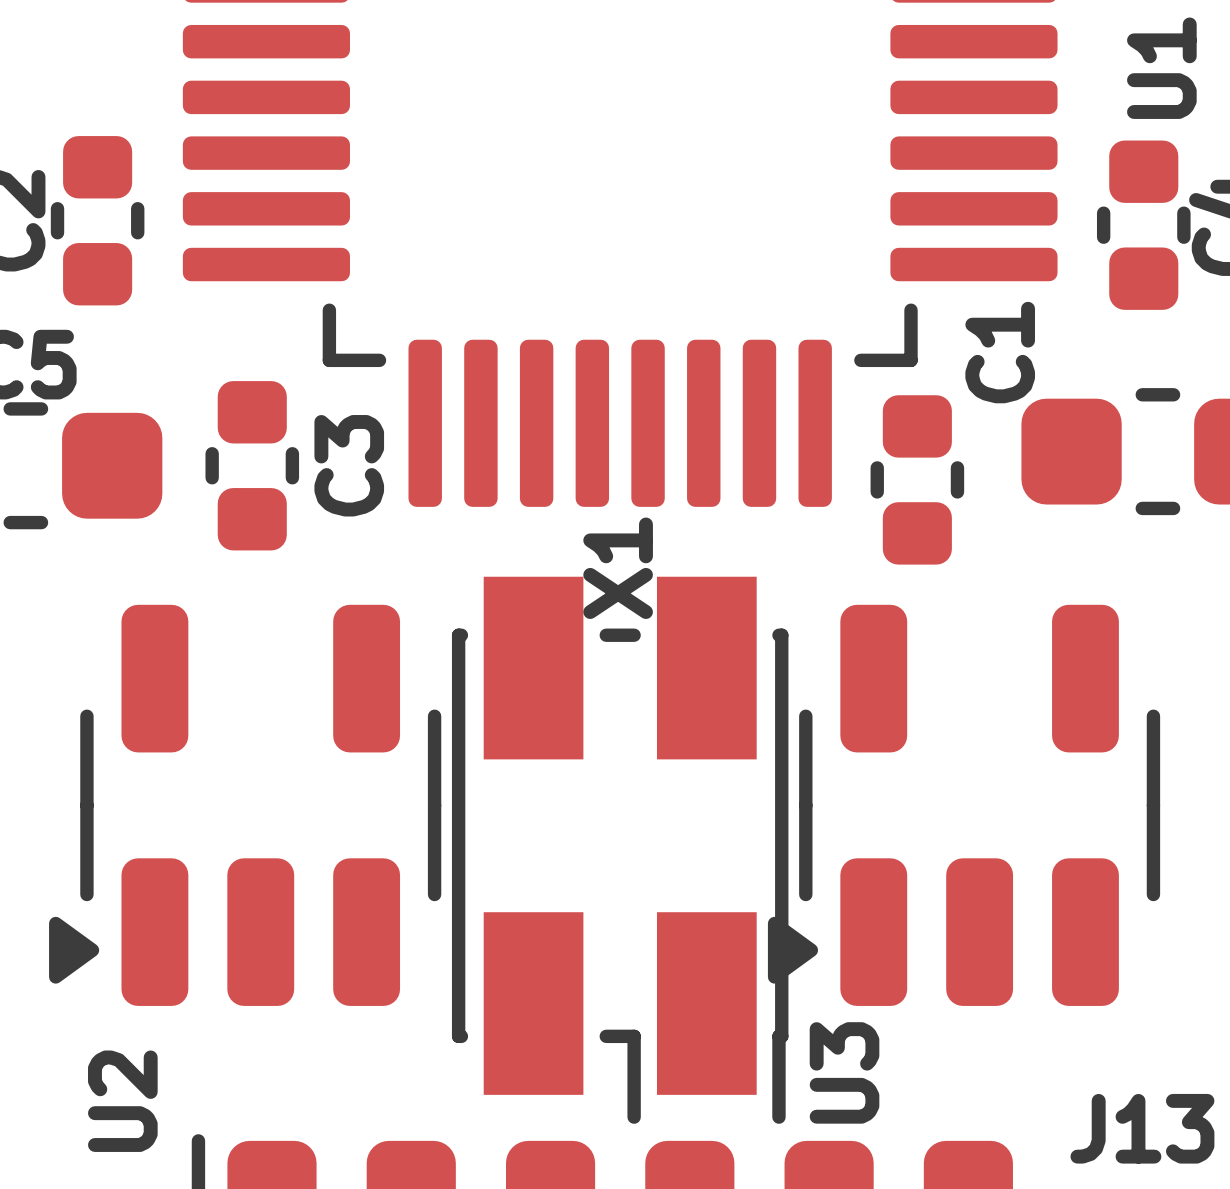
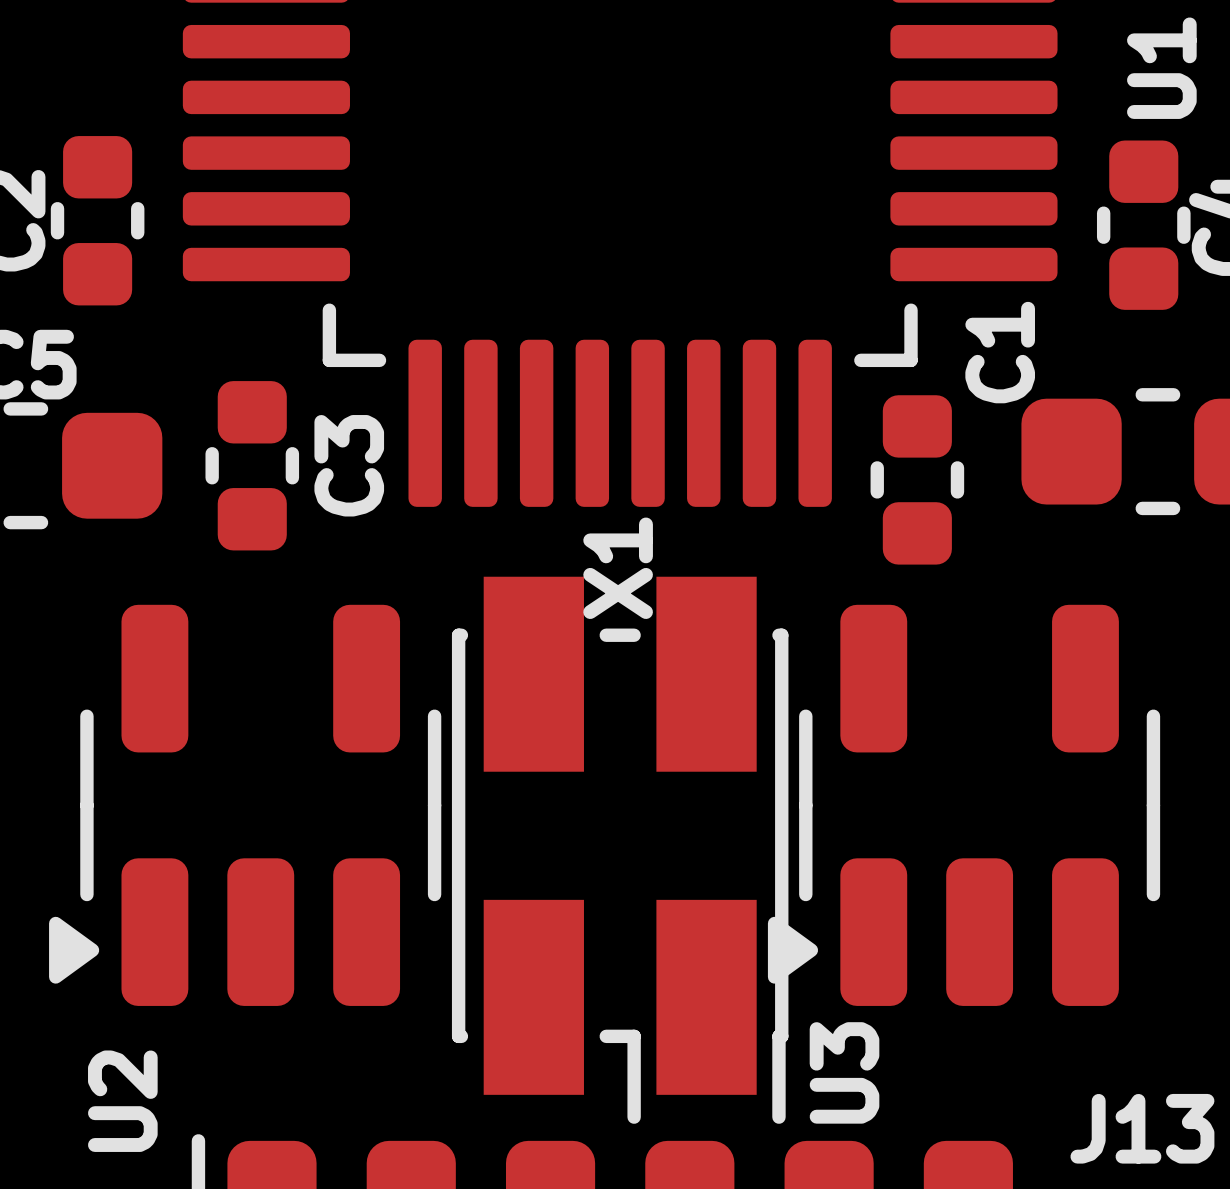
X1 footprint: [451, 576, 789, 1124] -> [451, 576, 789, 1124]

